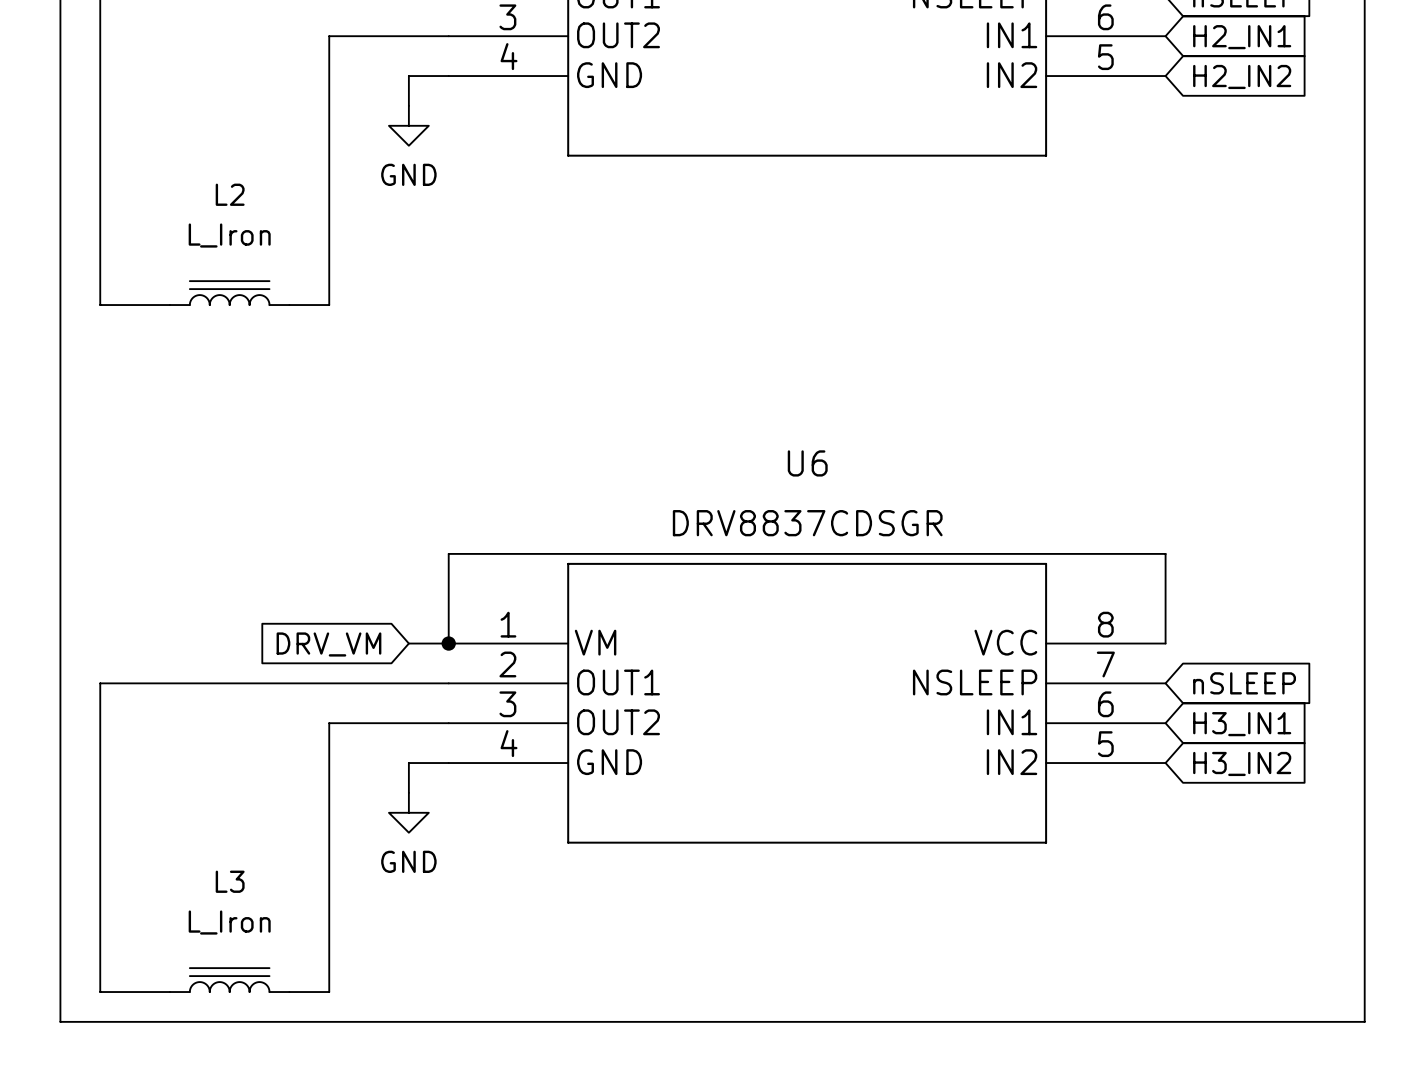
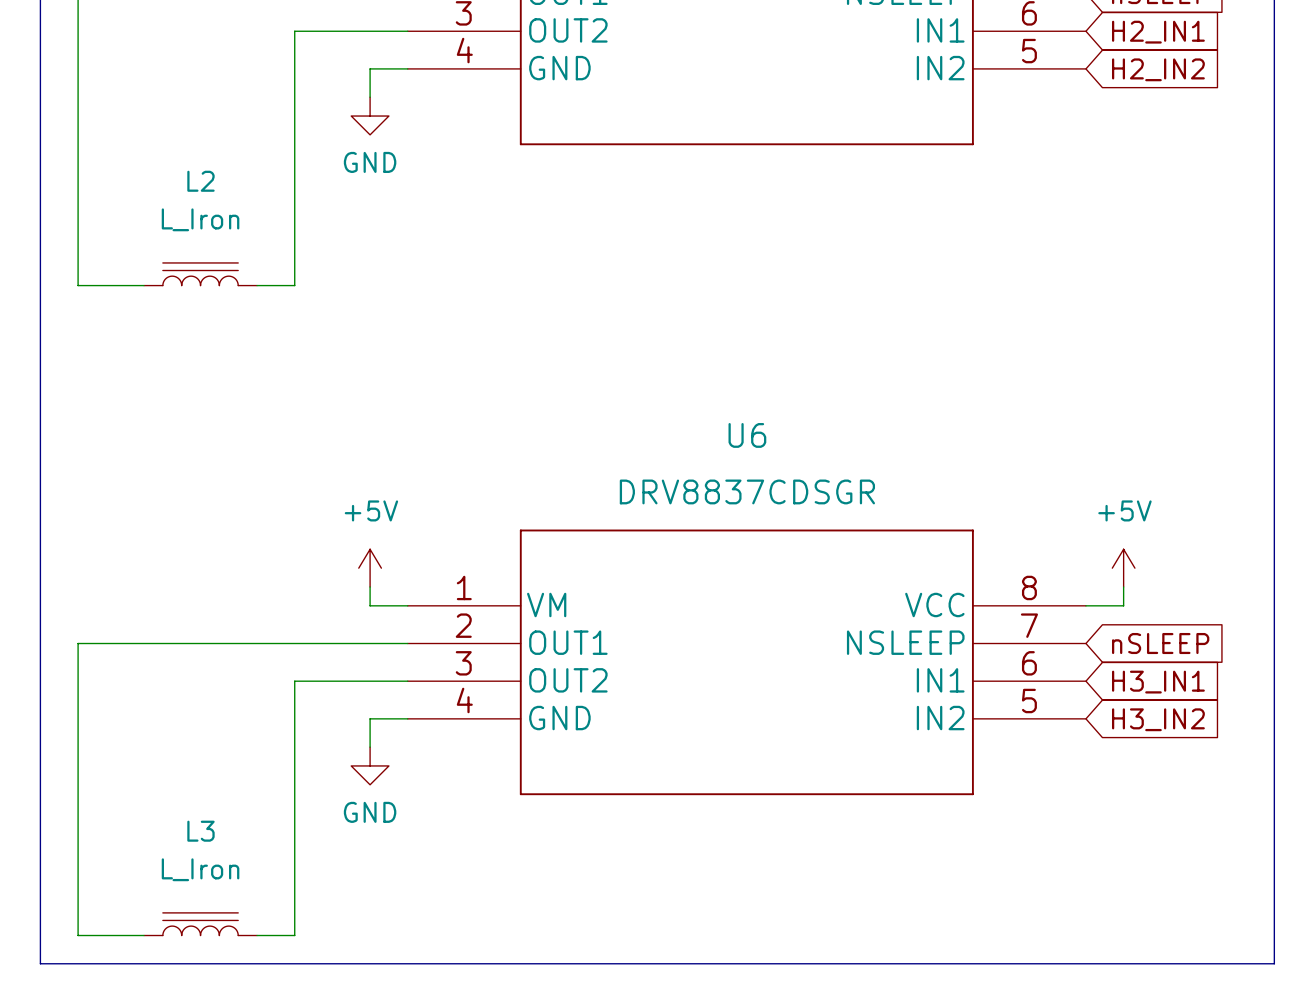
power symbol: none -> +5V (370, 568)
power symbol: none -> +5V (1123, 568)
wire: none -> (370, 586) (370, 605)
wire: (448, 643) (448, 553) (1165, 553) (1165, 643) -> (1123, 586) (1123, 605) (1085, 605)
junction: (448, 643) -> none
global label: DRV_VM (328, 644) -> none

